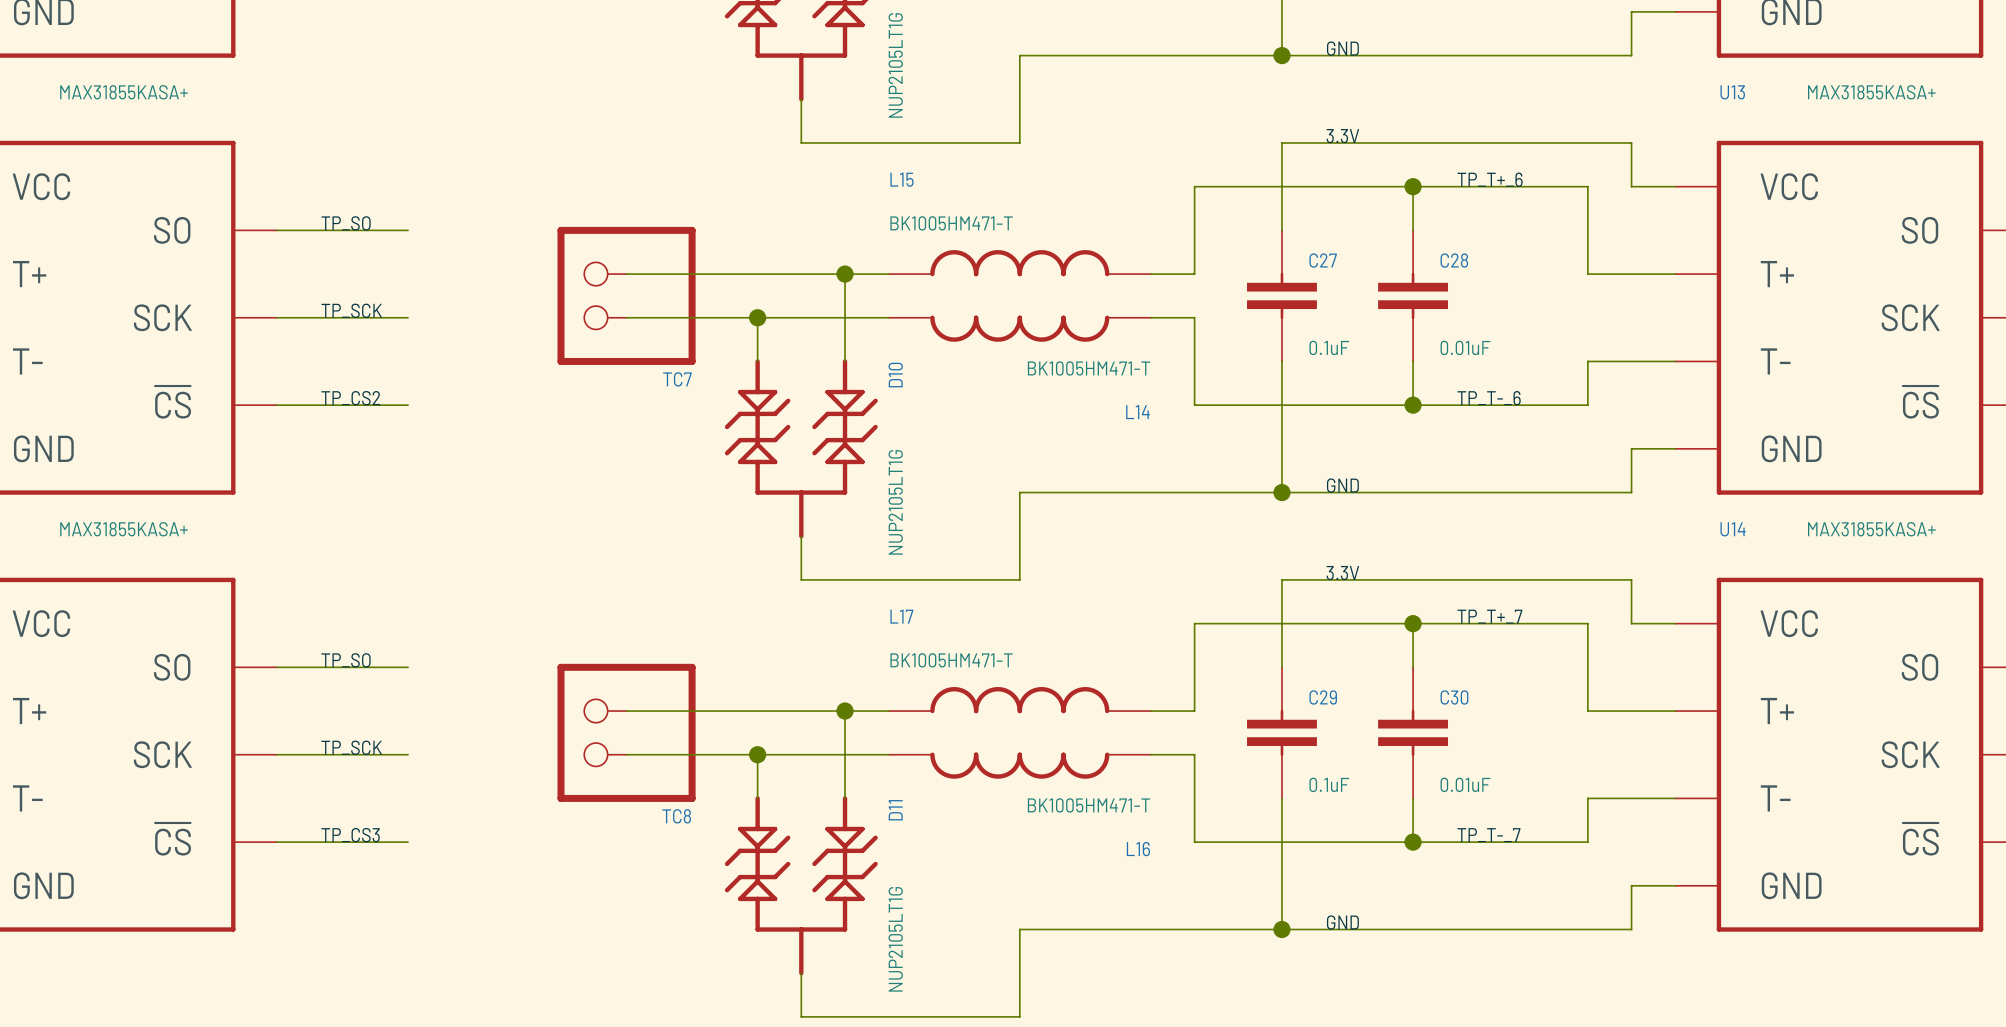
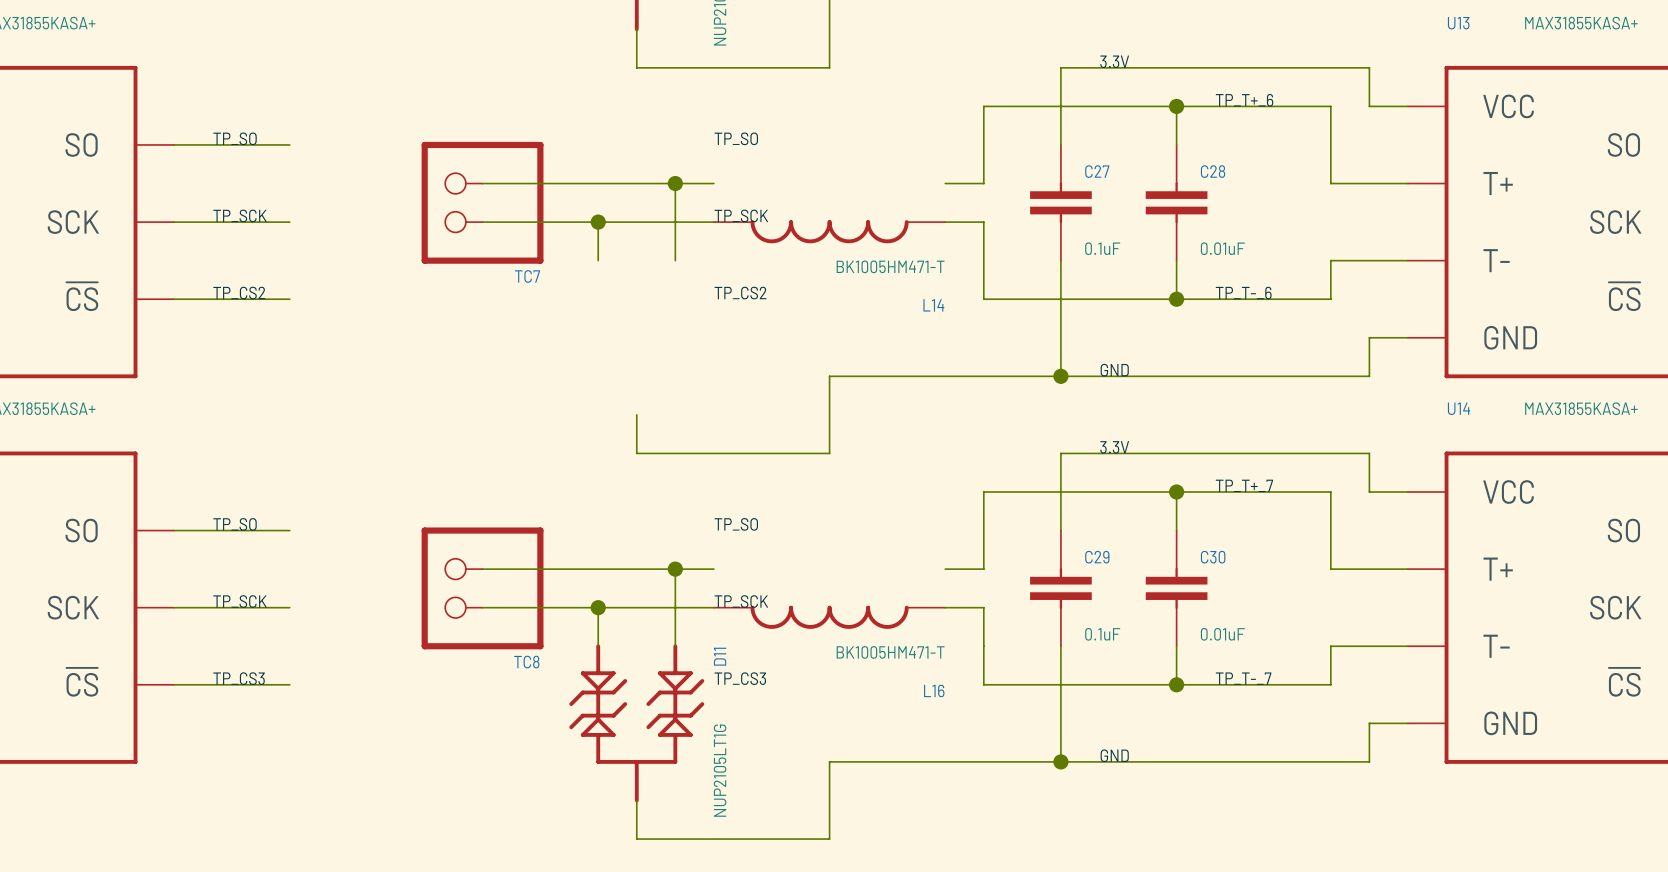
label: none -> TP_SO (736, 138)
L15: BK1005HM471-T (1019, 263) -> none
label: none -> TP_SCK (741, 215)
label: none -> TP_CS2 (740, 293)
D10: NUP2105LT1G (801, 448) -> none
label: none -> TP_SO (736, 524)
L17: BK1005HM471-T (1019, 700) -> none
label: none -> TP_SCK (741, 601)
label: none -> TP_CS3 (740, 678)

